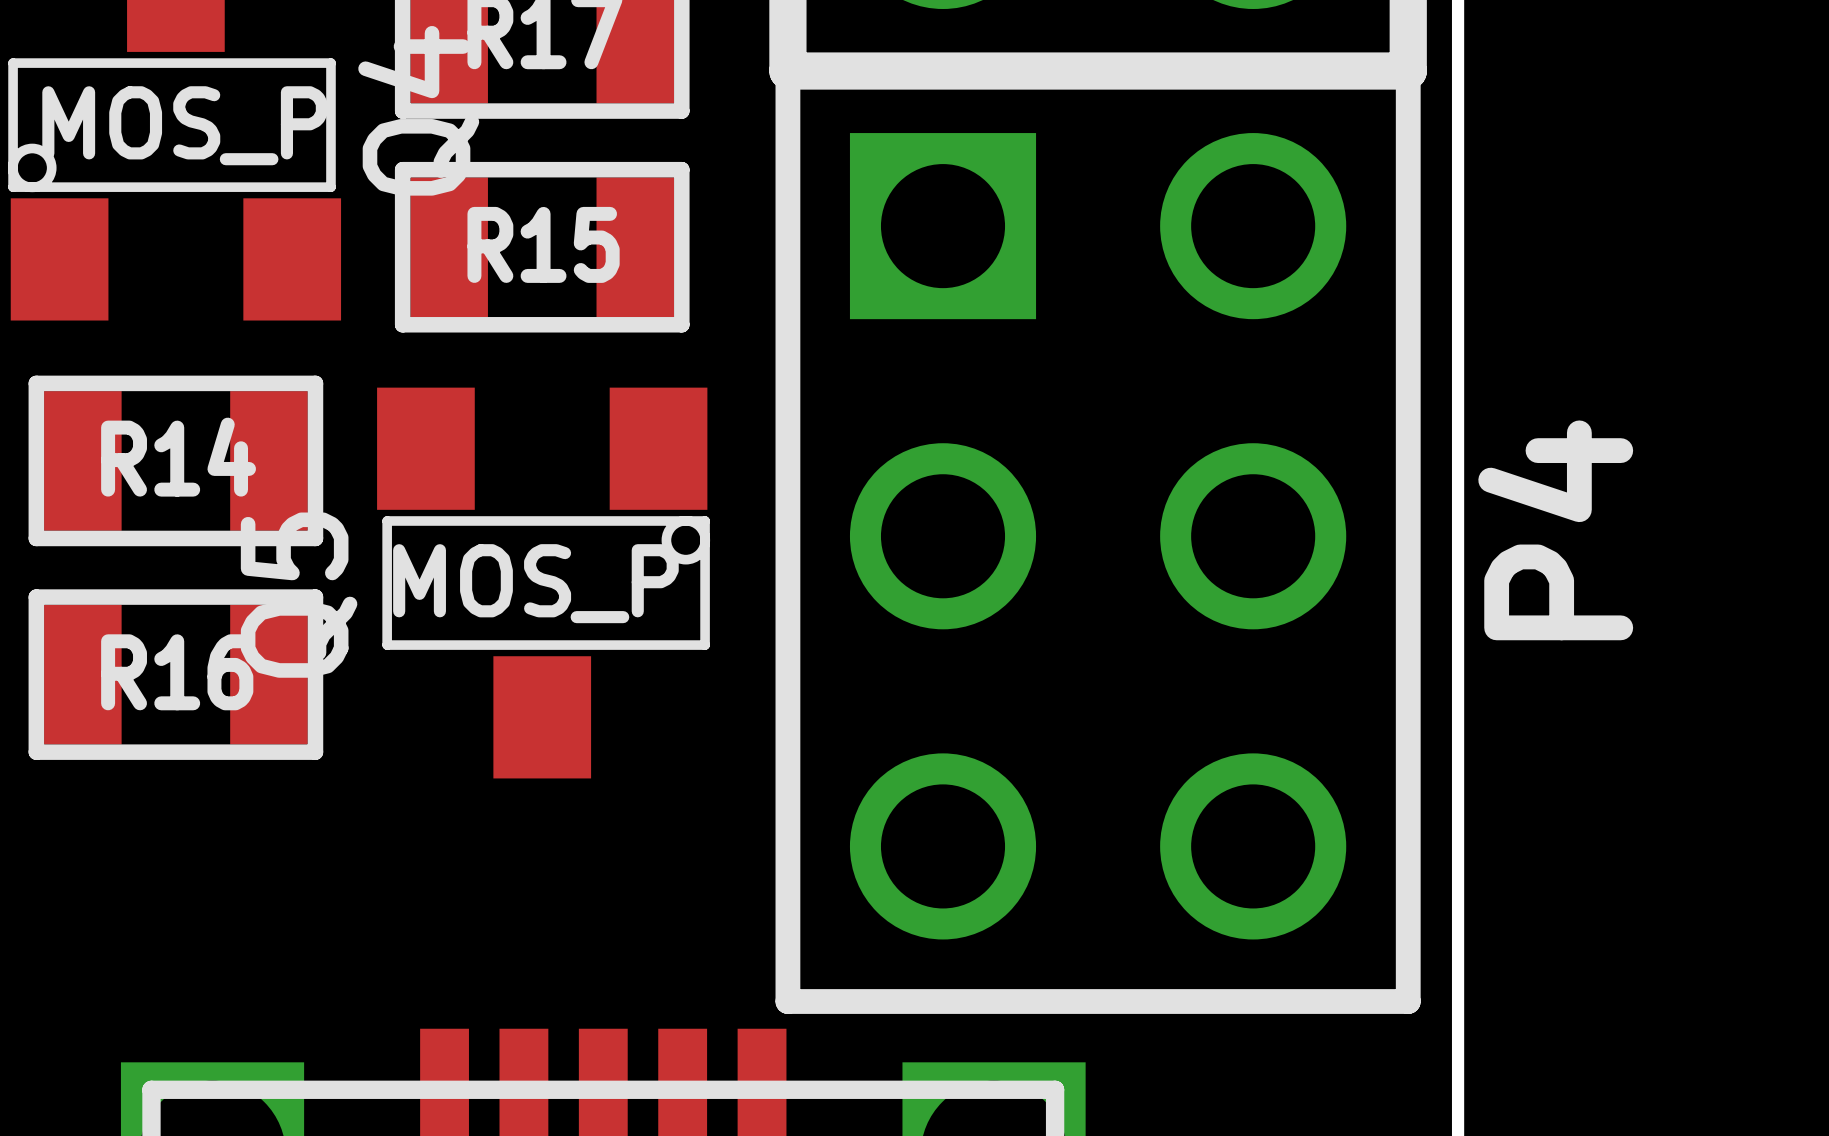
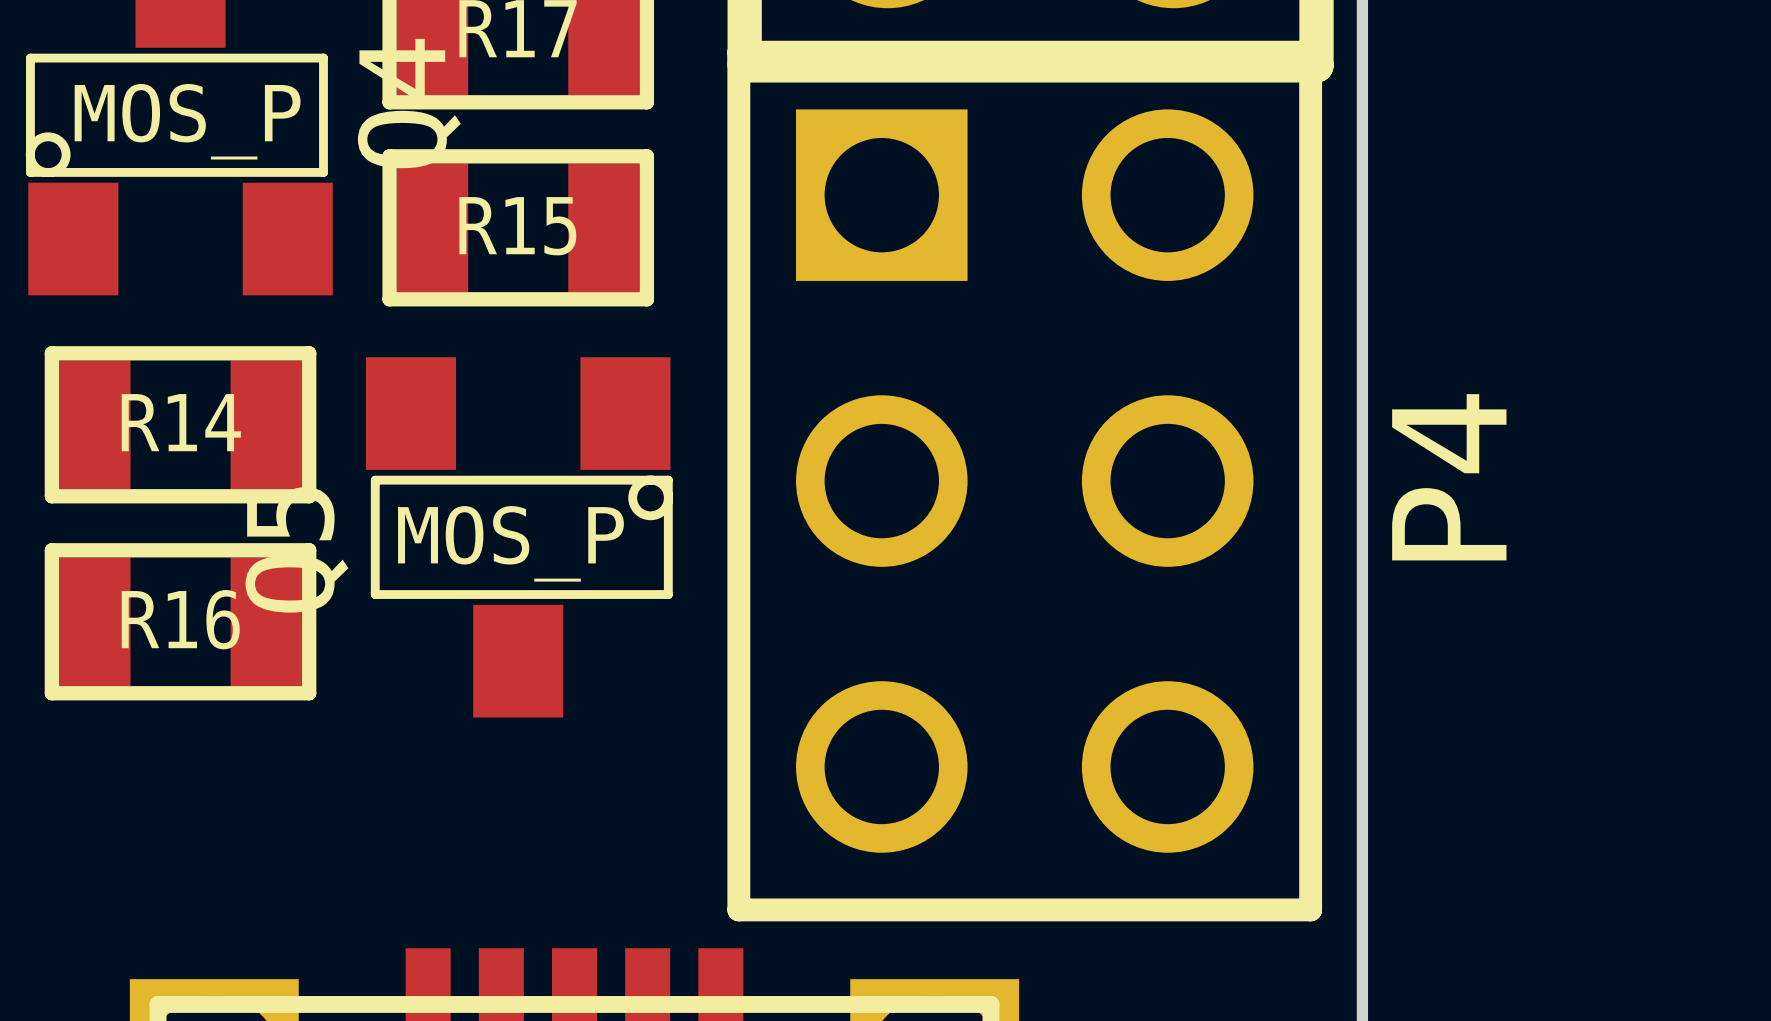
P4 position: (1098, 536) -> (1024, 481)

